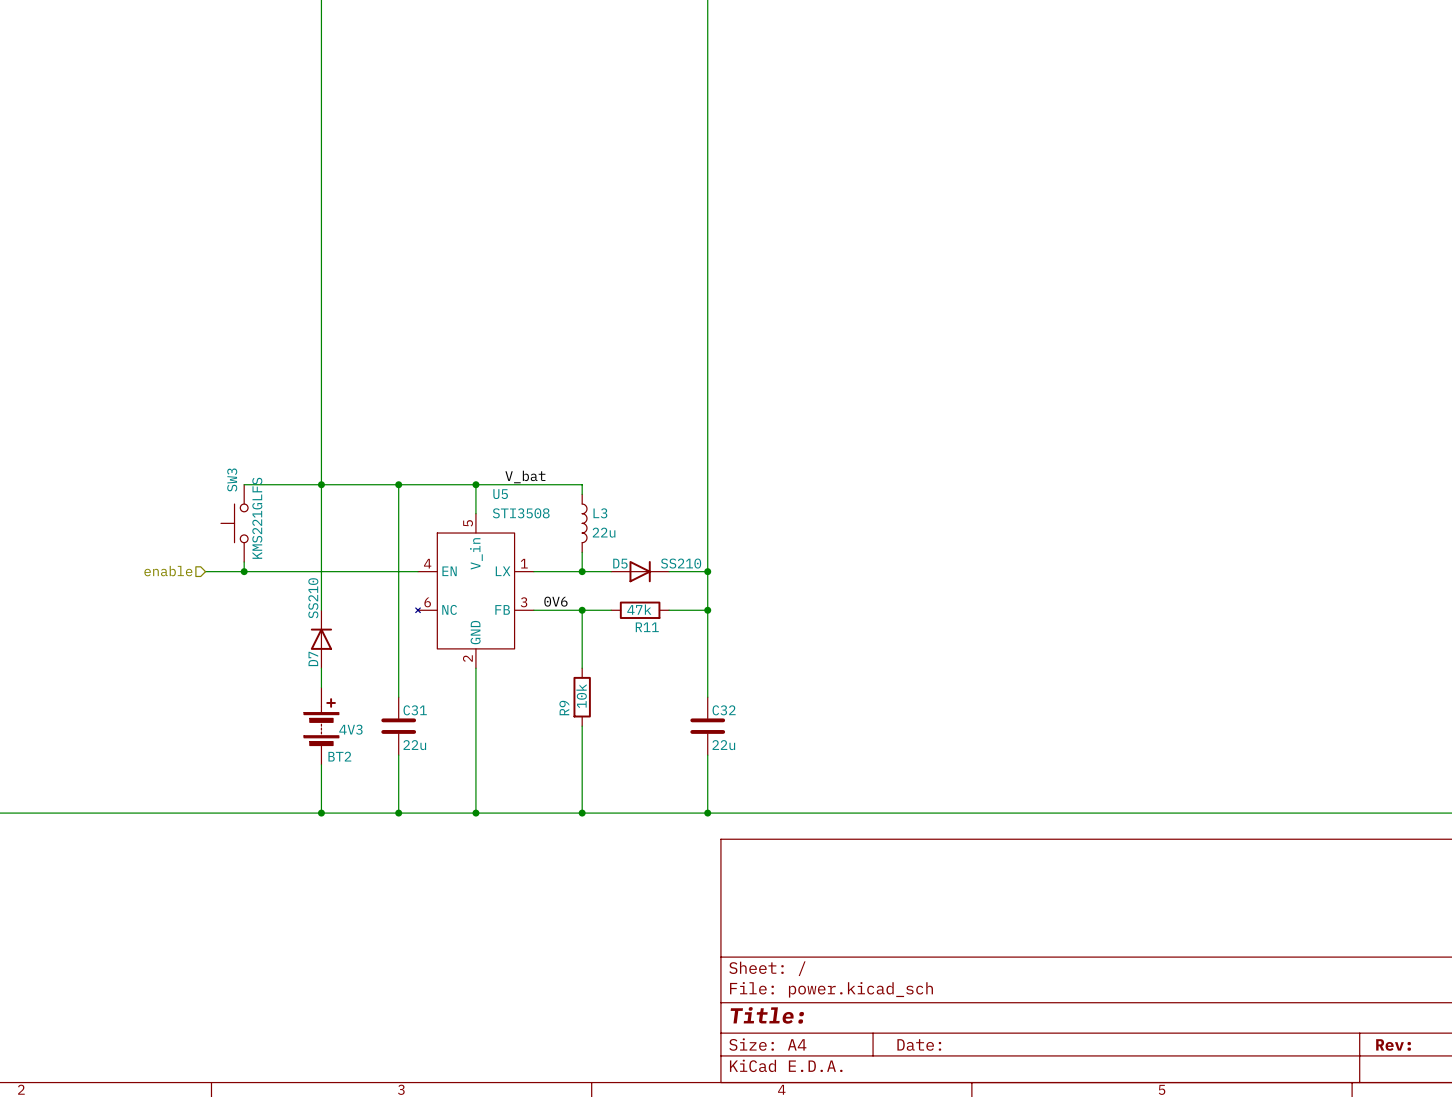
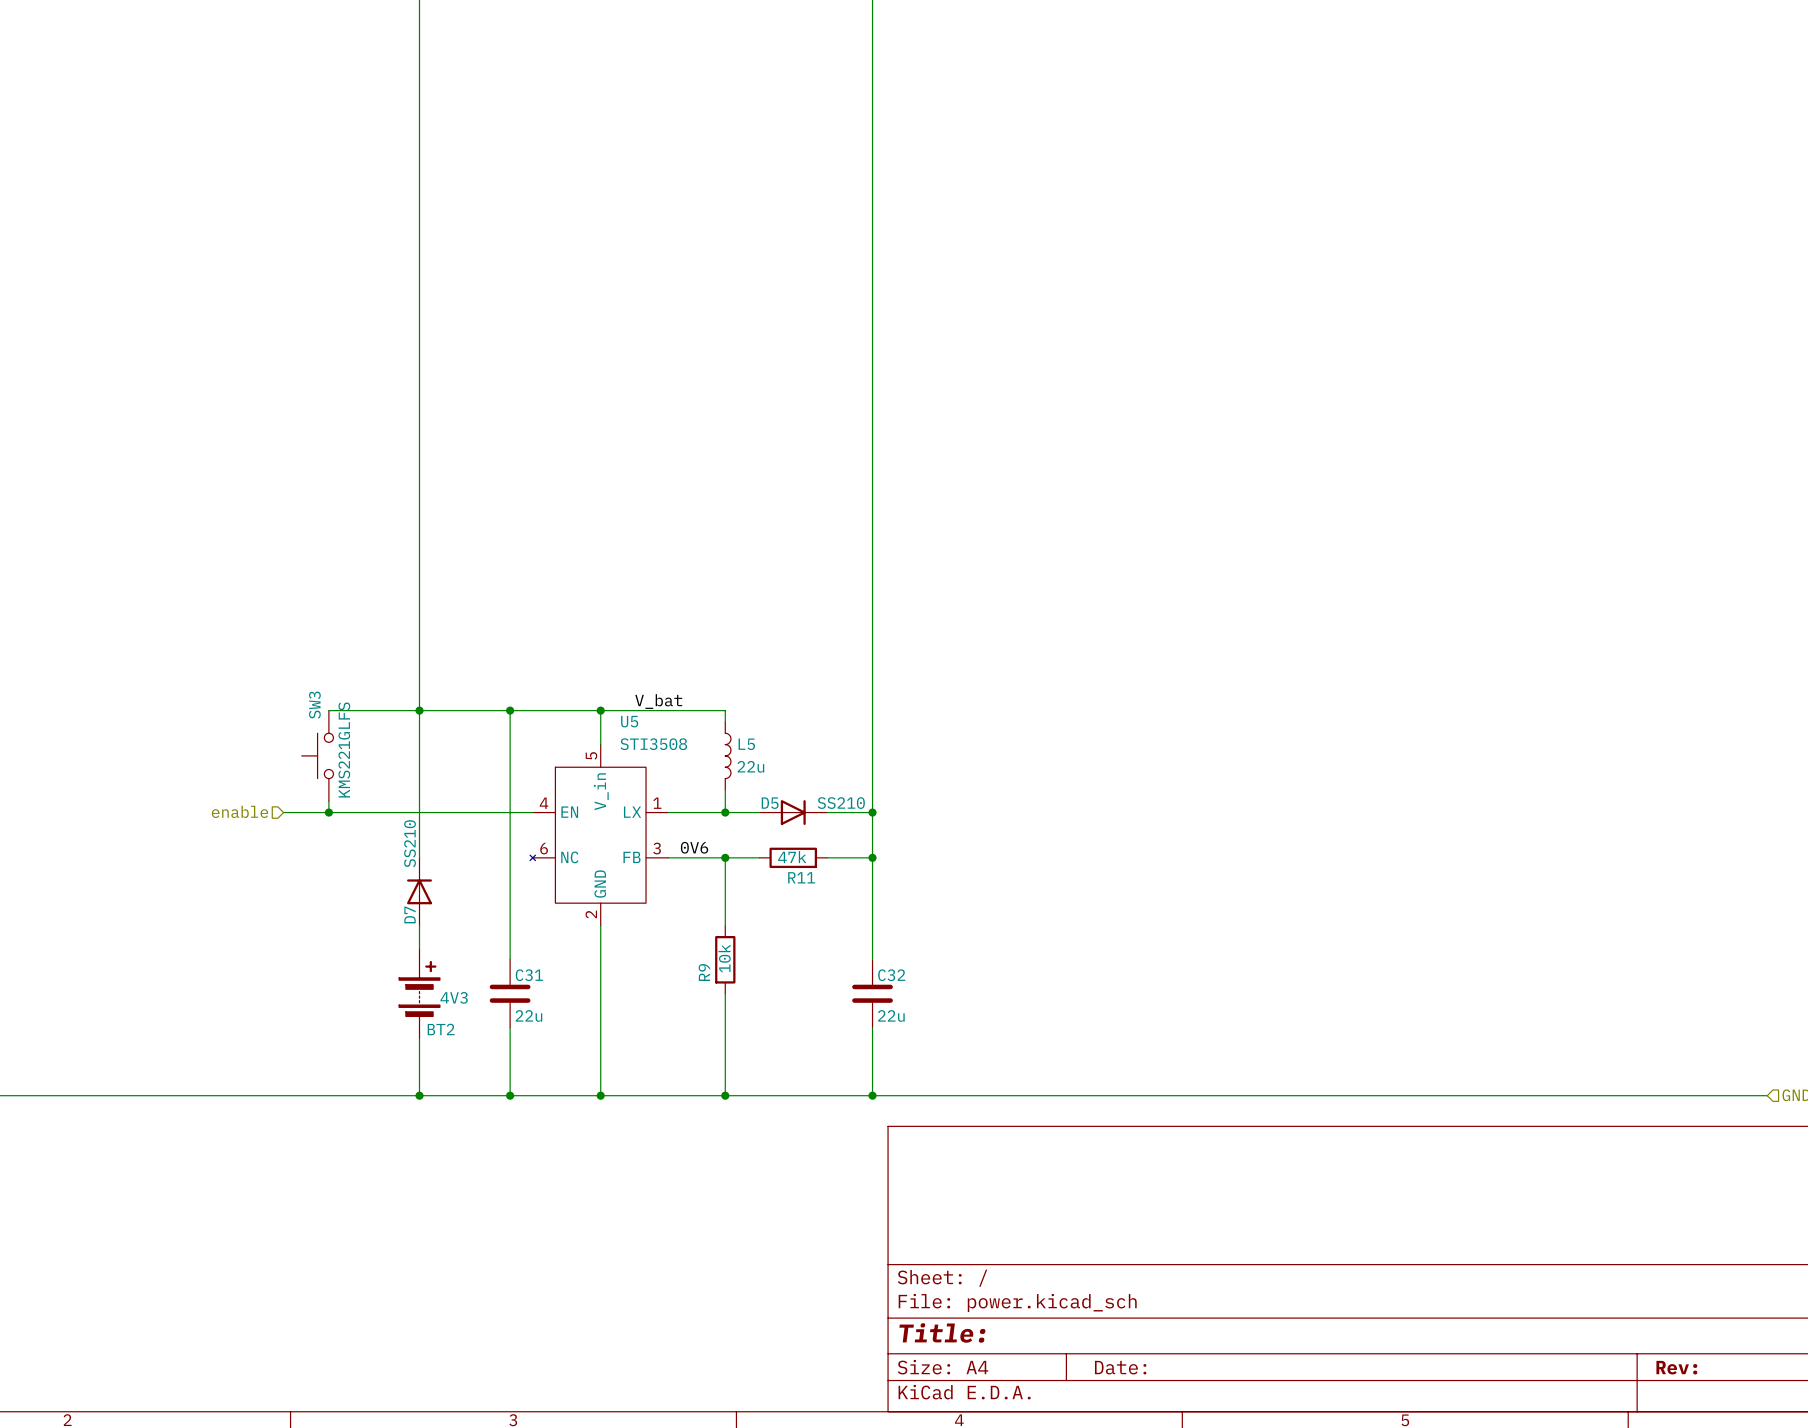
L3 name: L3 (600, 513) -> L5 (746, 744)

